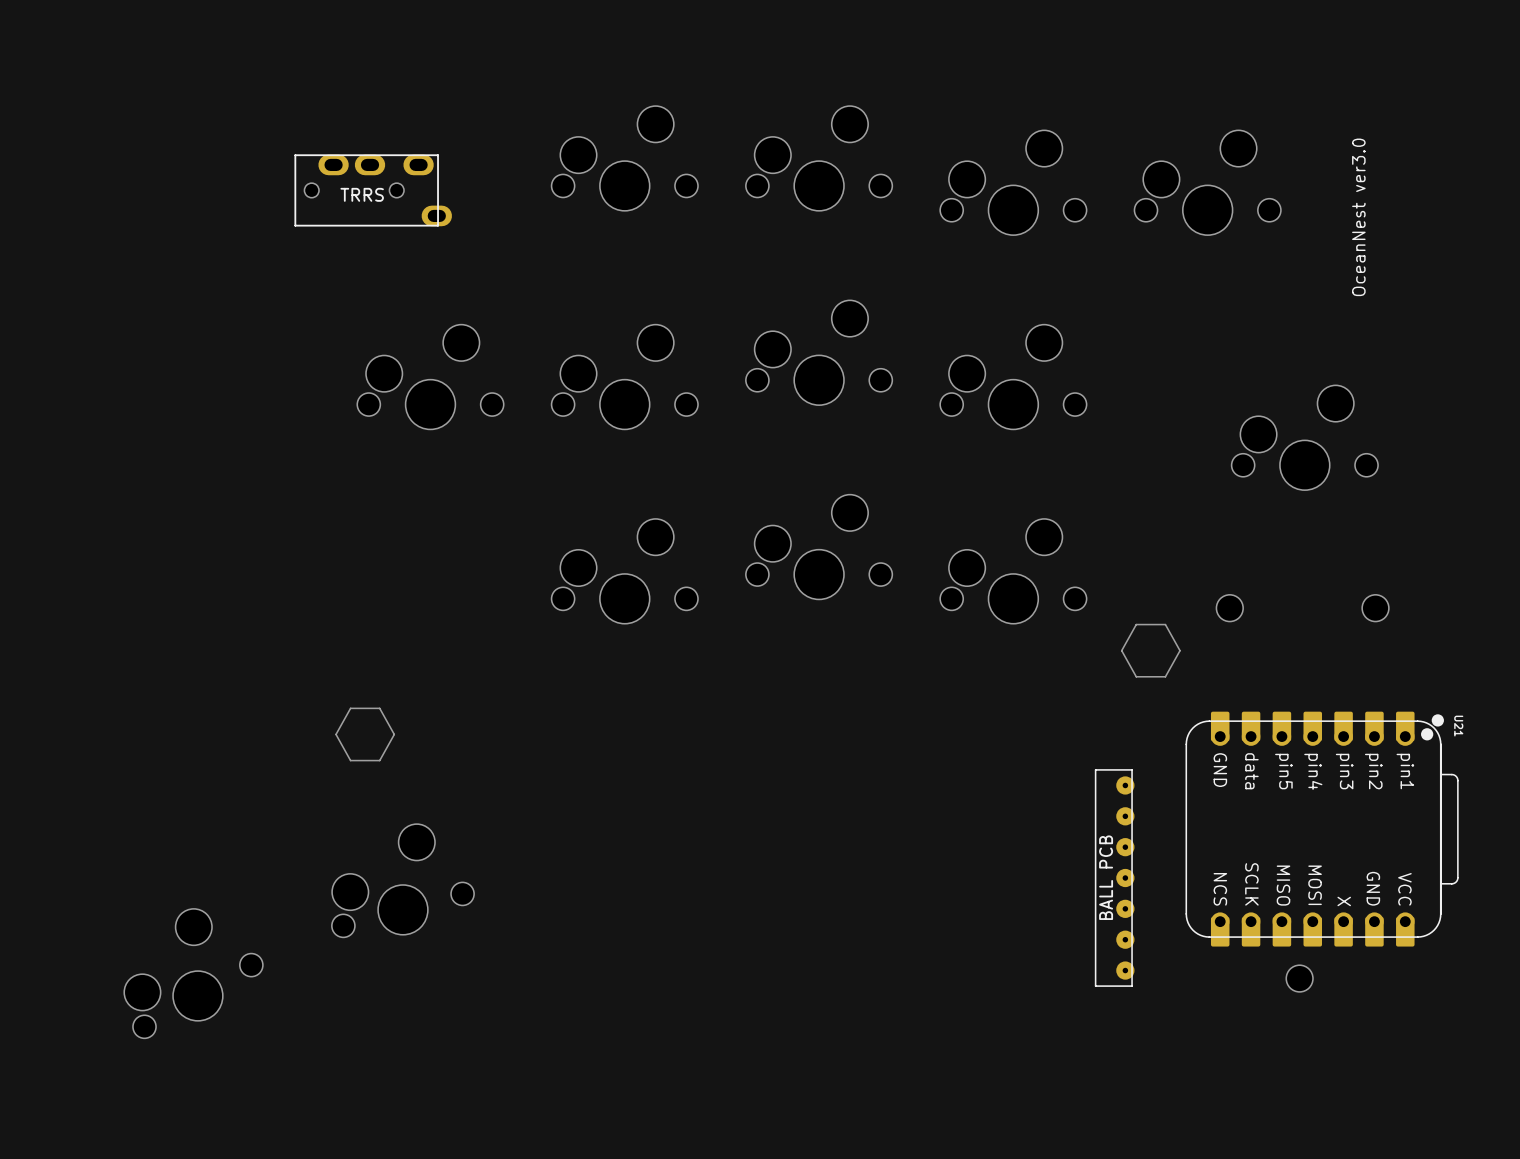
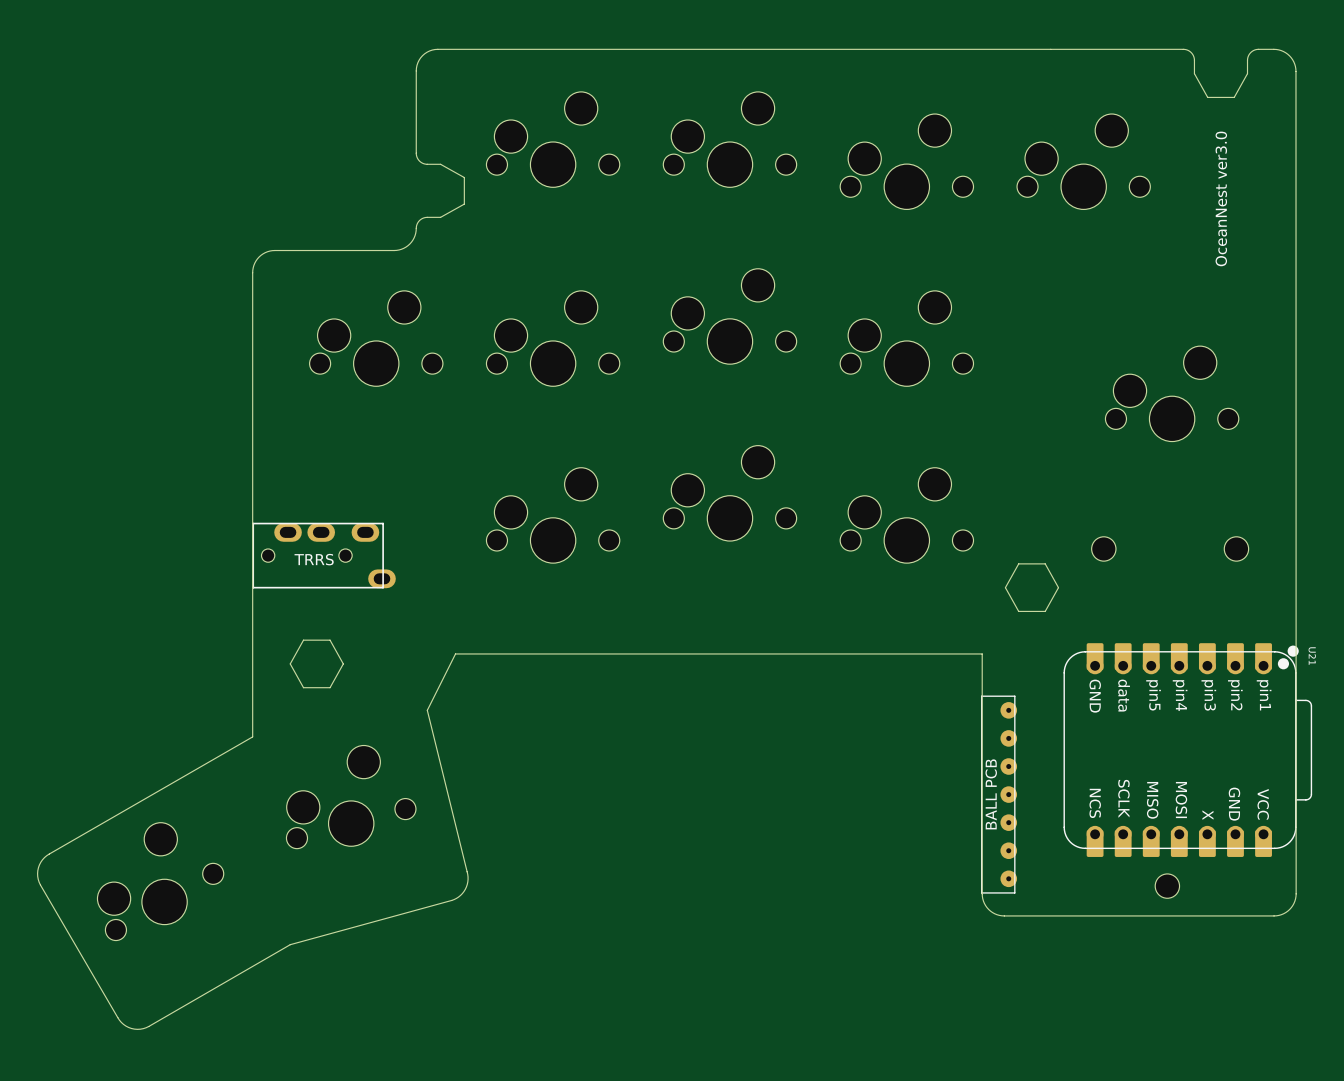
board edge: none -> (1295, 71) (1292, 59) (1283, 51) (1273, 49) (1254, 49) (1248, 55) (1247, 73) (1234, 97) (1207, 97) (1194, 73) (1193, 55) (1189, 51) (1183, 49) (437, 49) (424, 53) (419, 60) (416, 68) (416, 155) (422, 163) (440, 164) (464, 177) (464, 204) (440, 217) (426, 217) (420, 219) (416, 224) (412, 240) (401, 249) (272, 250) (260, 255) (253, 267) (252, 736) (49, 854) (42, 859) (38, 867) (37, 876) (40, 885) (119, 1020) (131, 1028) (146, 1027) (290, 944) (451, 900) (462, 893) (467, 884) (467, 874) (427, 710) (455, 653) (982, 653) (982, 893) (984, 903) (990, 911) (1004, 915) (1274, 915) (1287, 911) (1293, 903) (1296, 893) (1295, 71)
part: (373, 190) -> none
part: none -> (324, 555)

